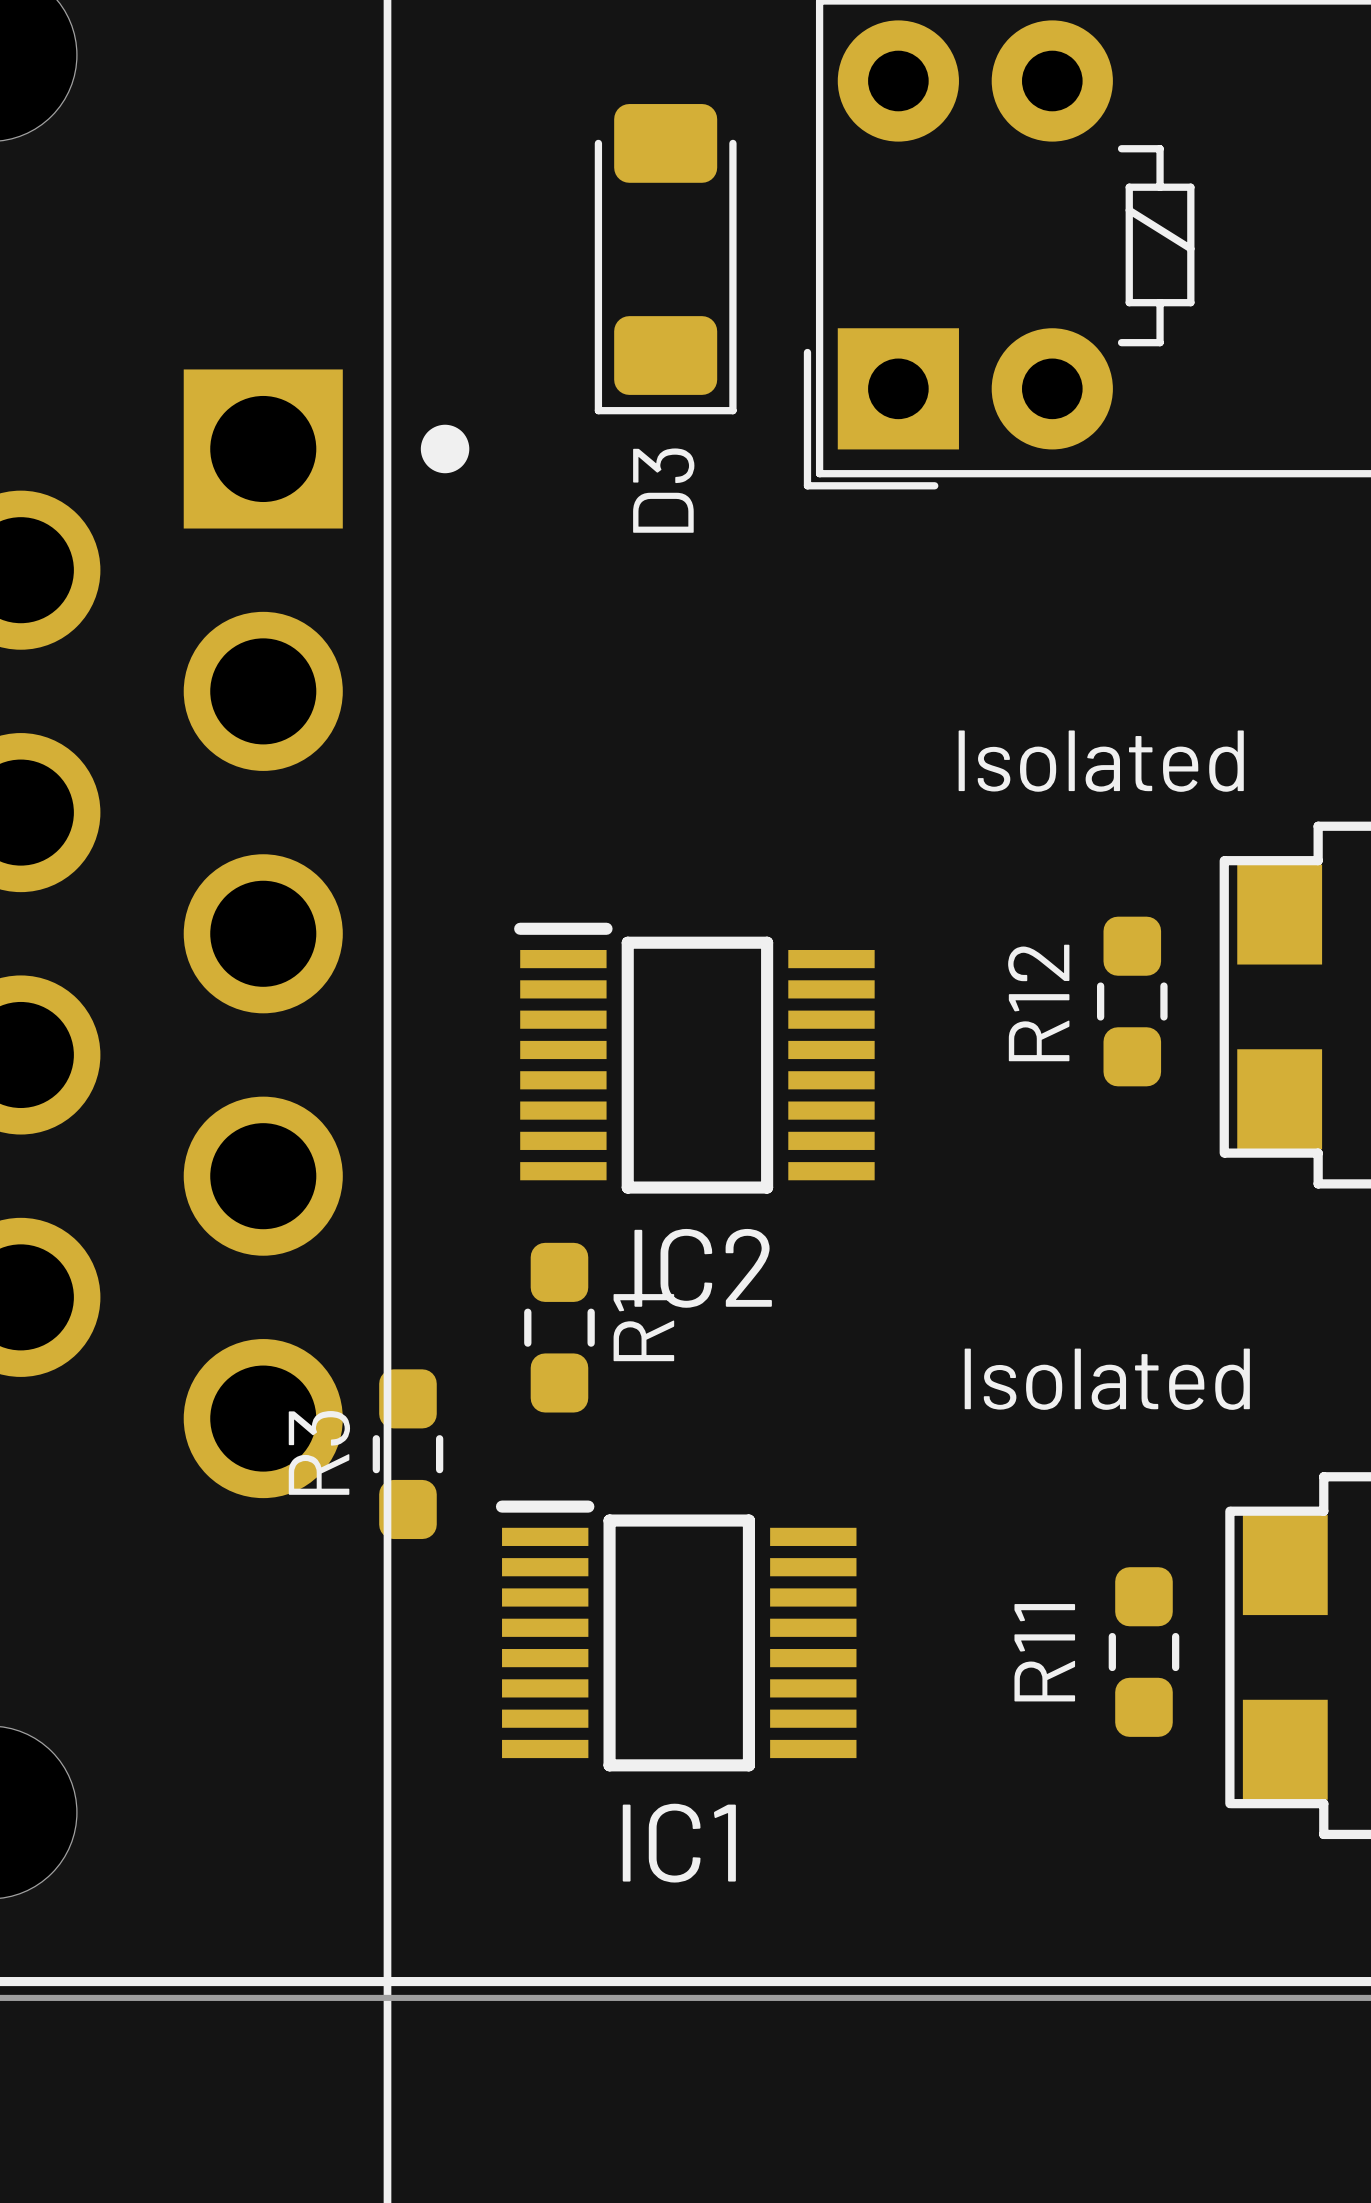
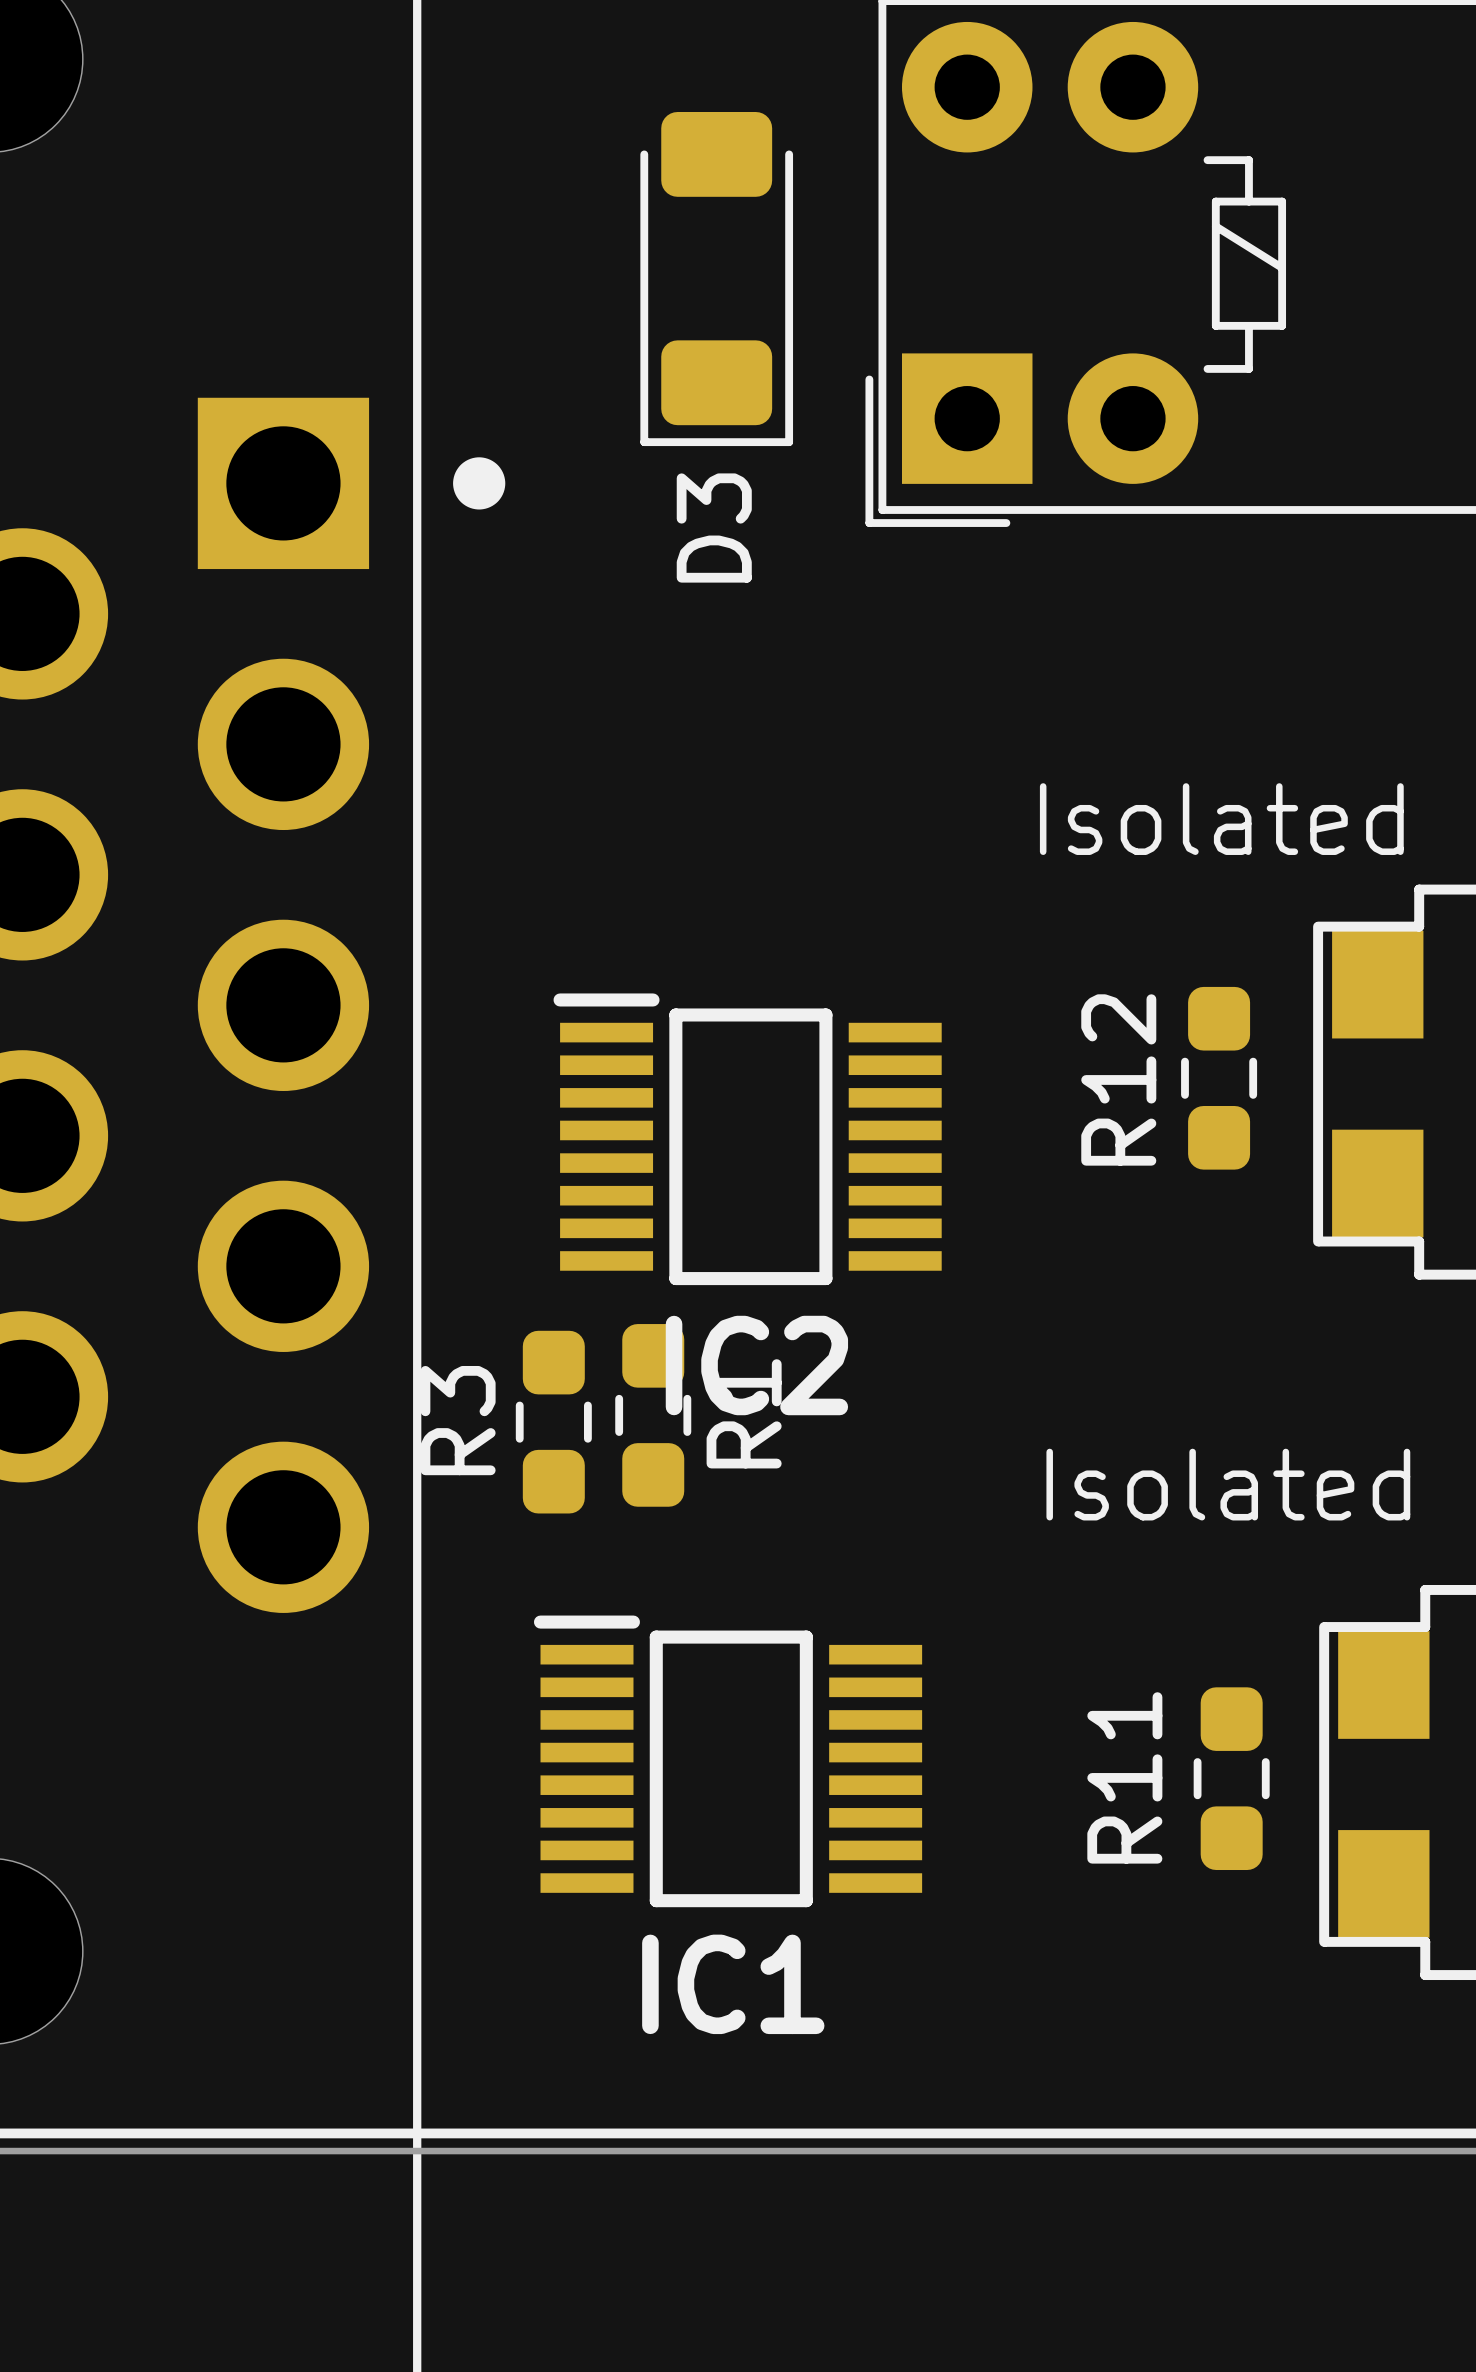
R1 position: (559, 1327) -> (653, 1415)
R3 position: (407, 1454) -> (553, 1422)

